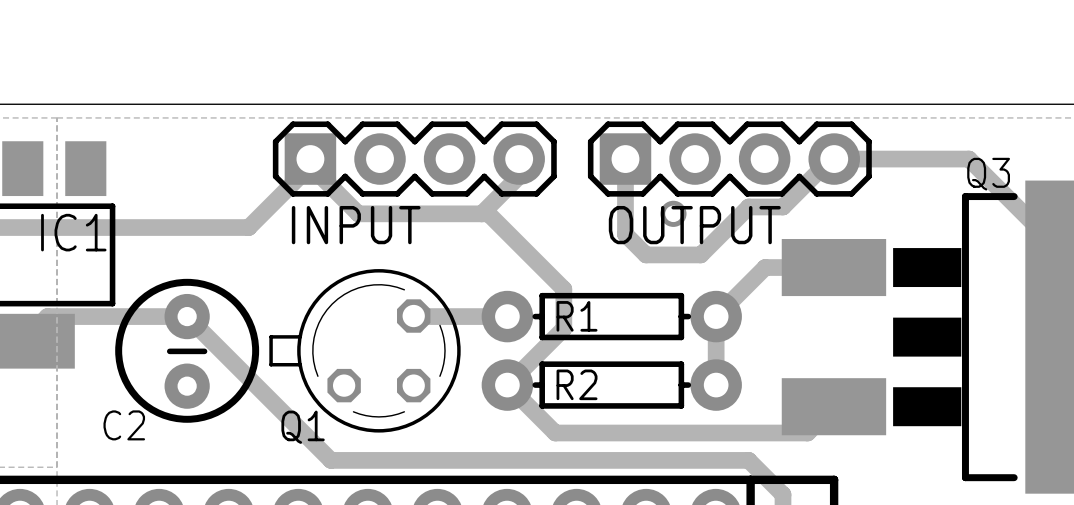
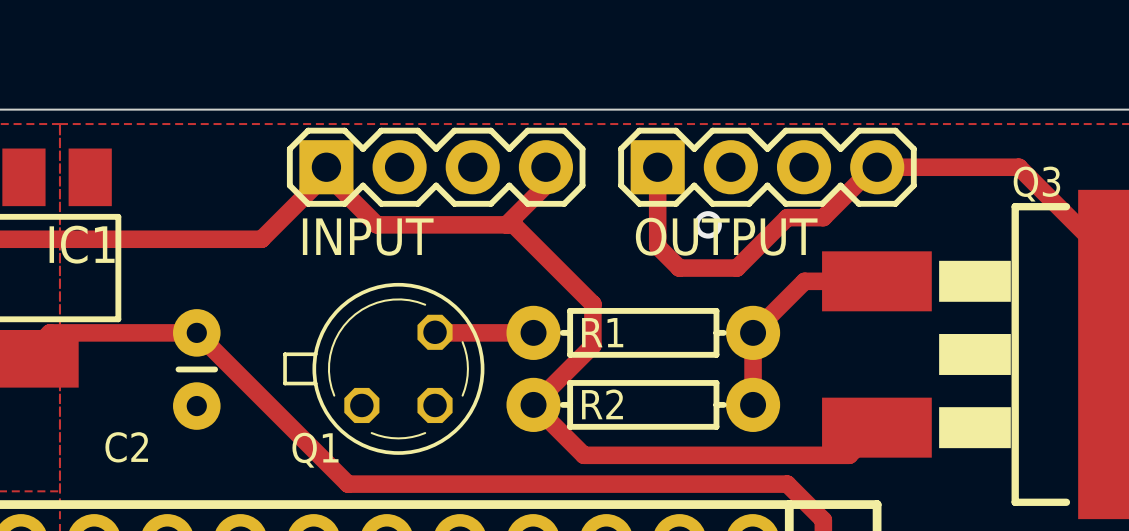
drawing: [115, 278, 260, 423] -> none

